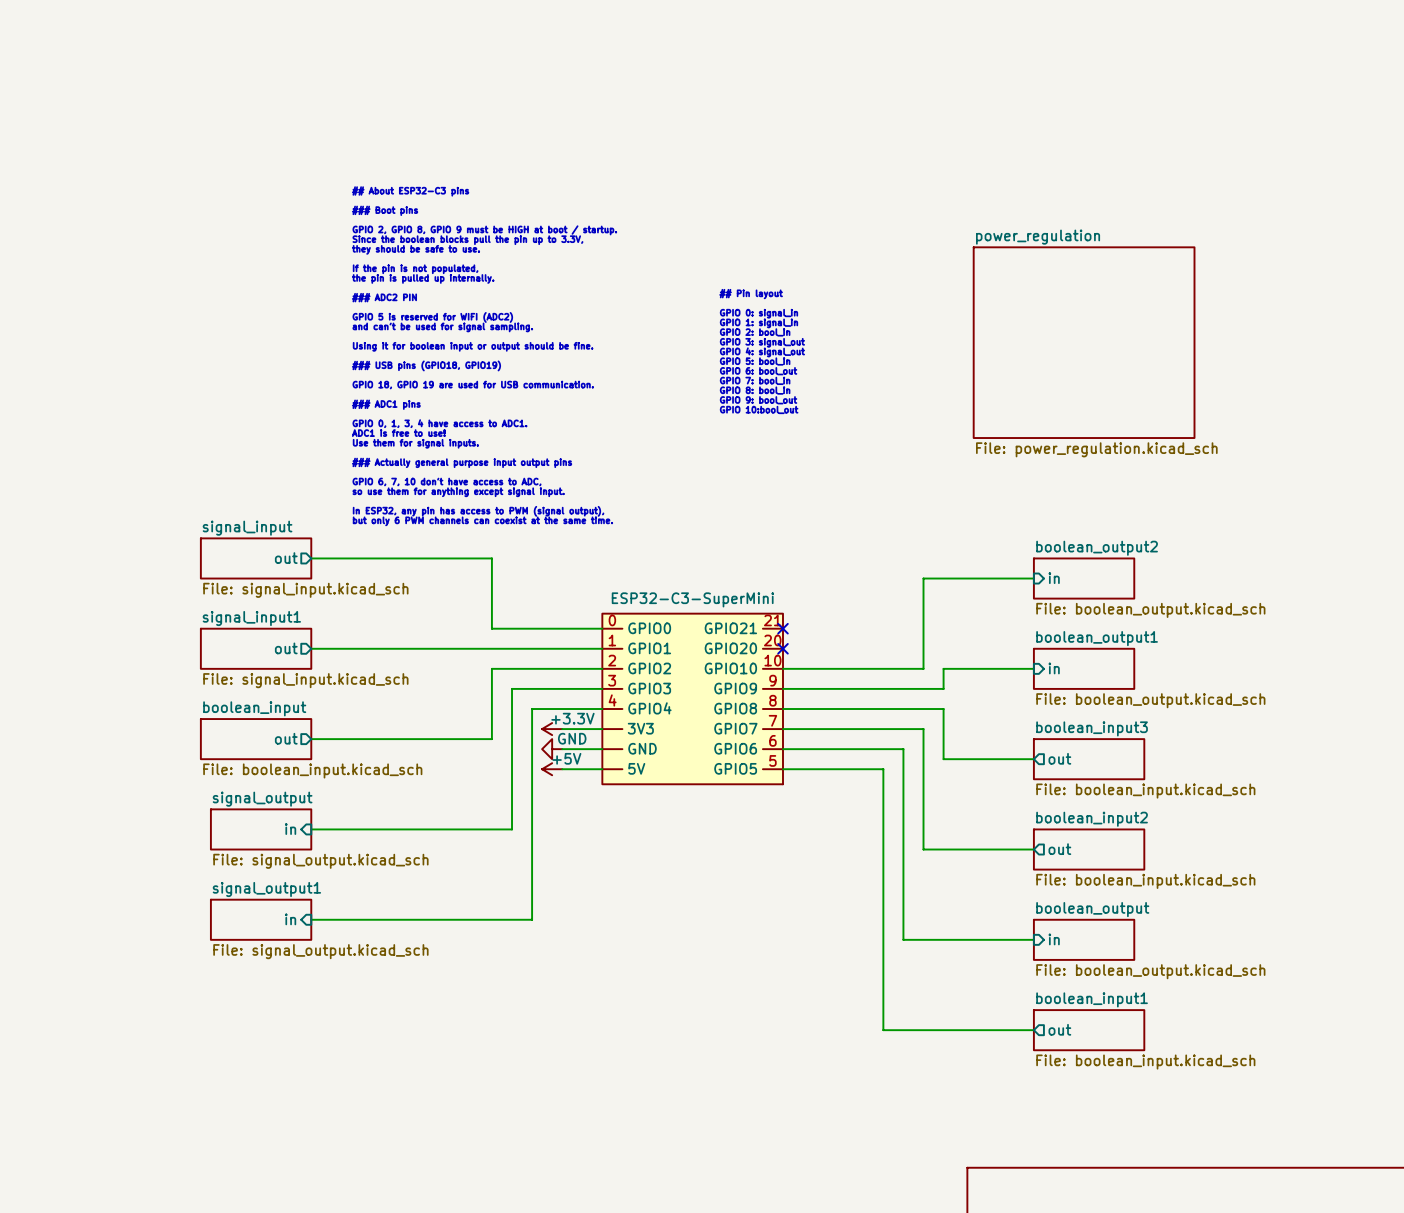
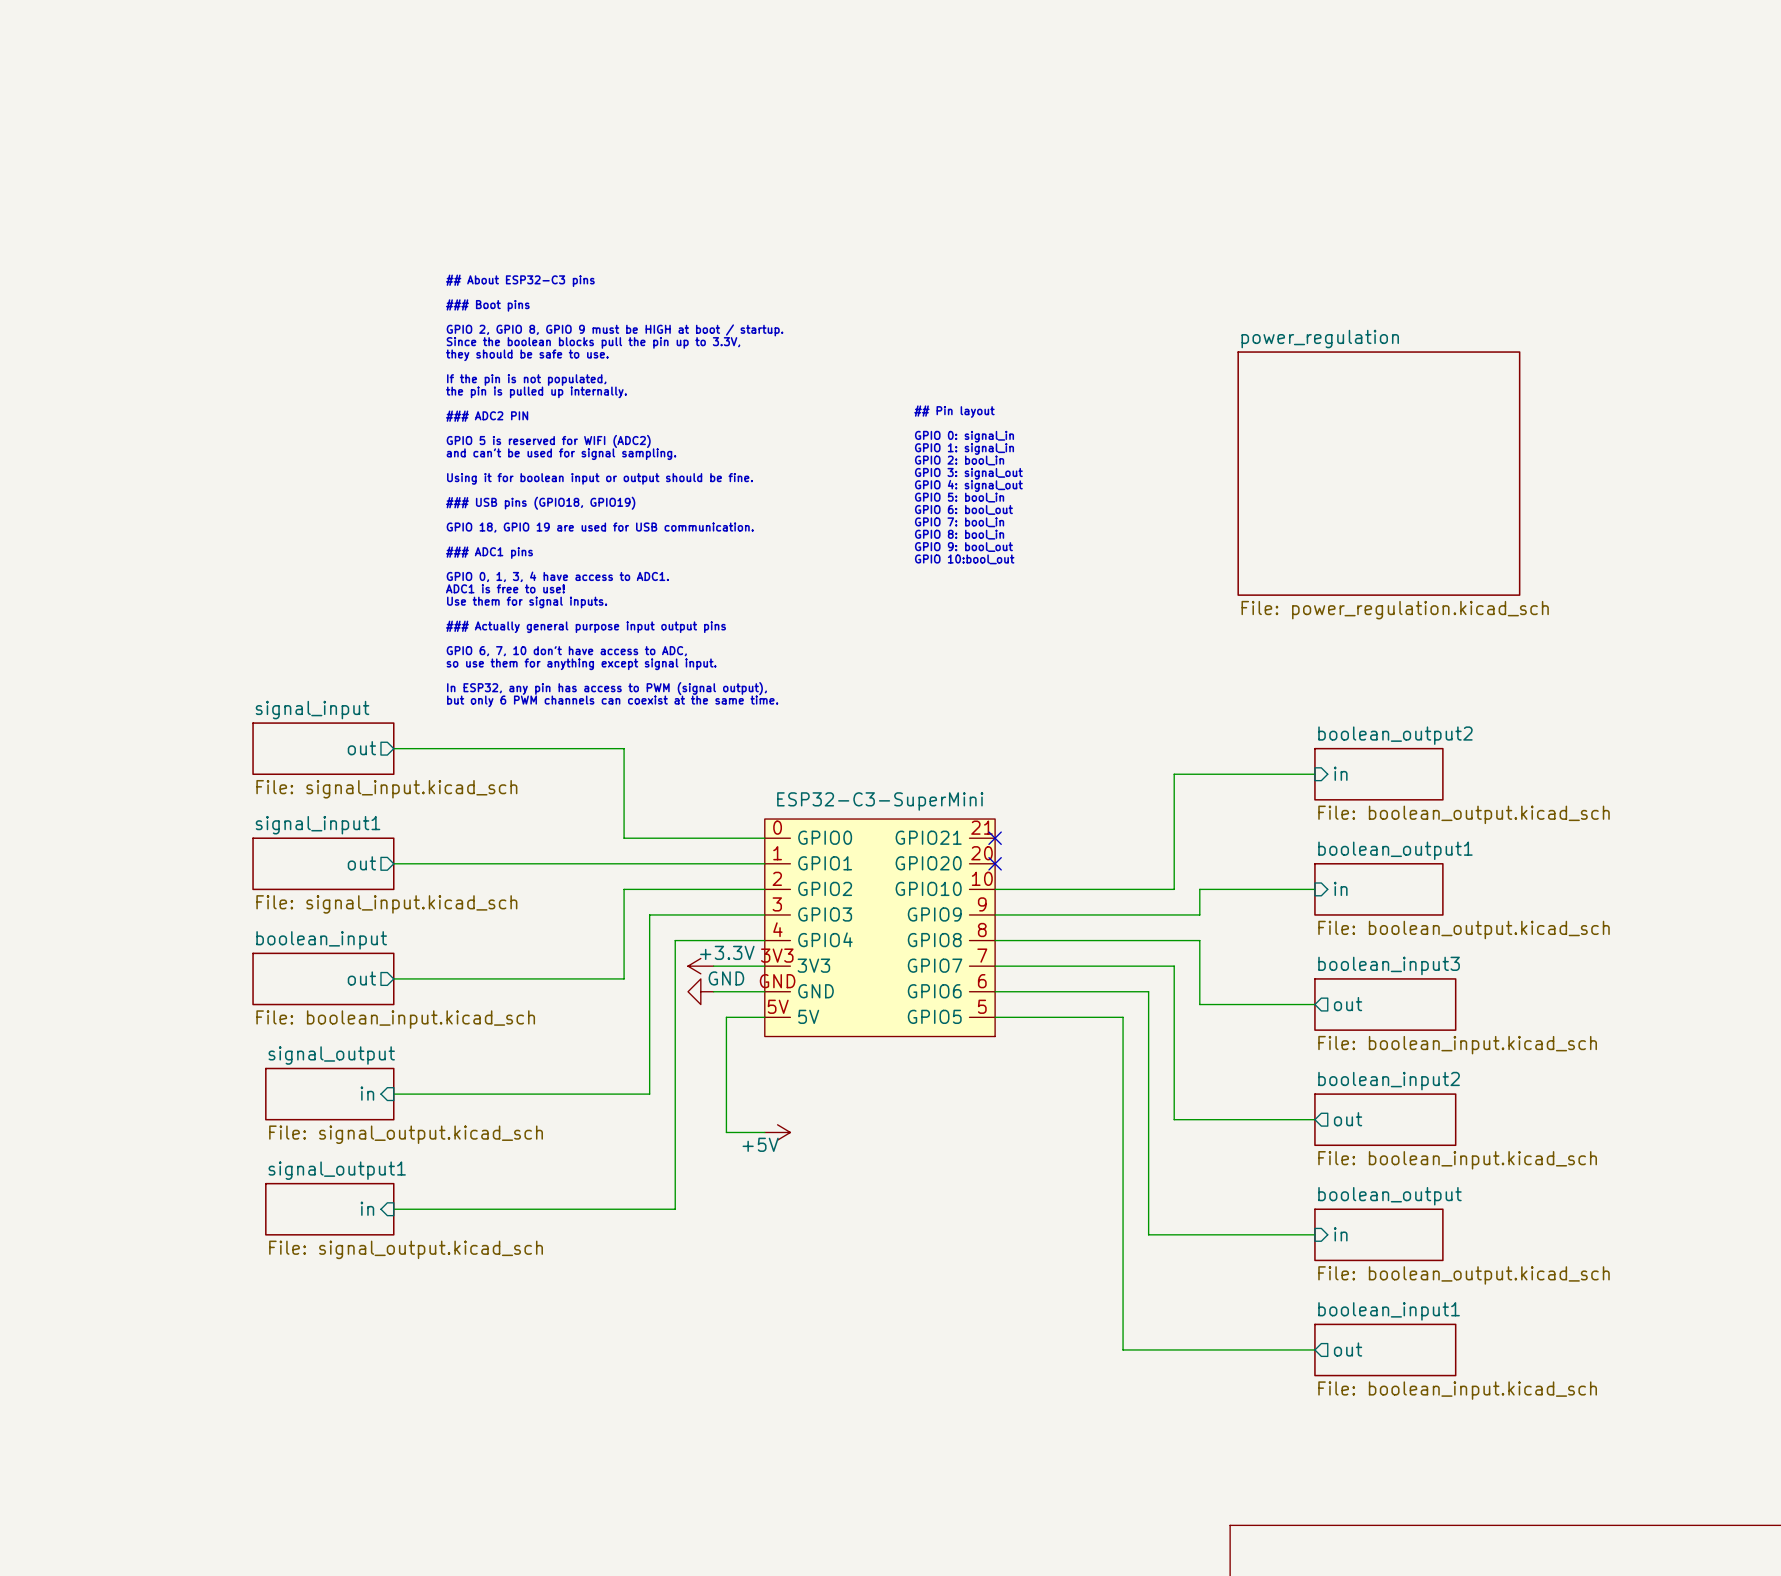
part pin number: none -> 3V3 (777, 955)
part pin number: none -> GND (777, 981)
part pin number: none -> 5V (778, 1006)
power symbol rotation: 0° (552, 769) -> 180° (777, 1132)
power symbol position: +5V (552, 769) -> +5V (777, 1132)
wire: (562, 769) (572, 769) -> (764, 1132) (726, 1132) (726, 1017)

